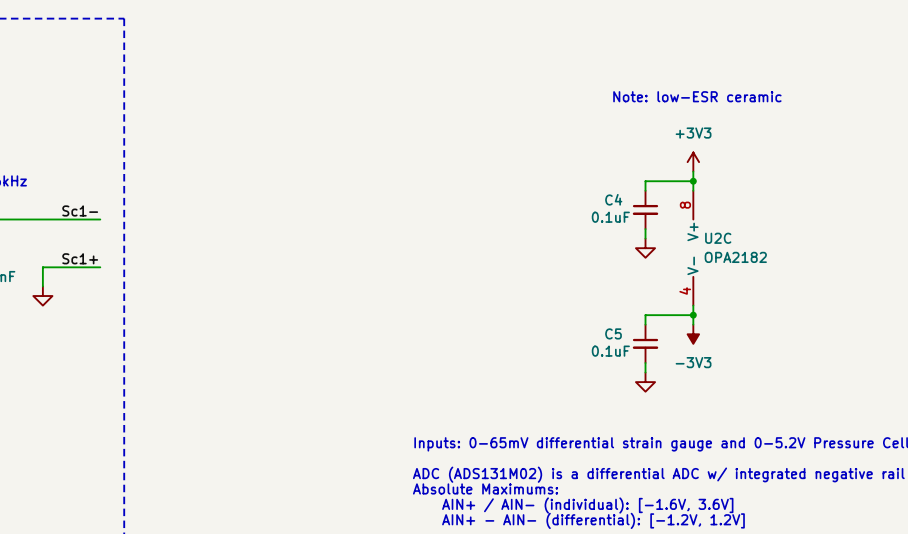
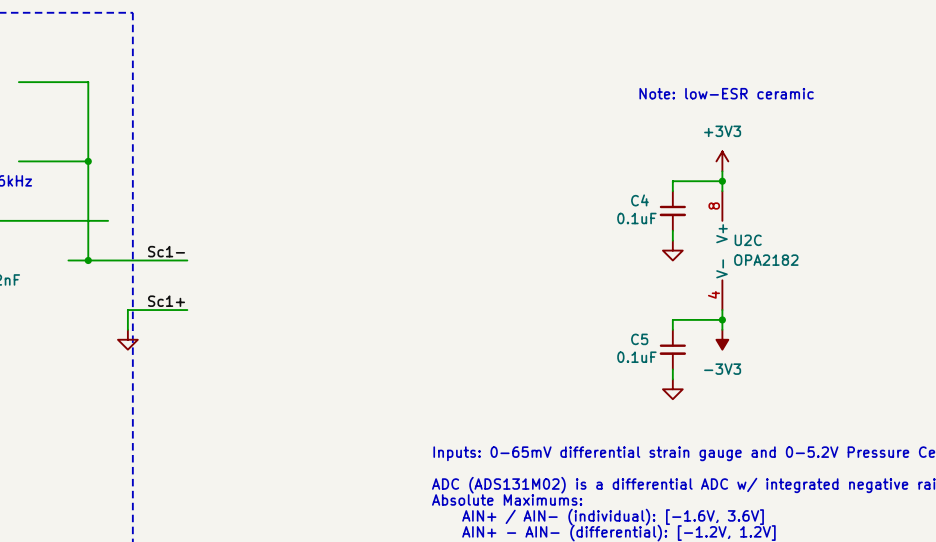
wire: none -> (18, 82) (88, 82) (88, 260)
wire: none -> (18, 161) (88, 161)
junction: none -> (88, 161)
label position: Sc1- (80, 210) -> Sc1- (166, 251)
wire: none -> (68, 260) (187, 260)
junction: none -> (88, 260)
label position: Sc1+ (80, 258) -> Sc1+ (166, 301)
wire: (100, 267) (42, 267) (42, 286) -> (187, 310) (127, 310) (127, 329)
power symbol: (42, 296) -> none
power symbol: none -> (127, 339)

